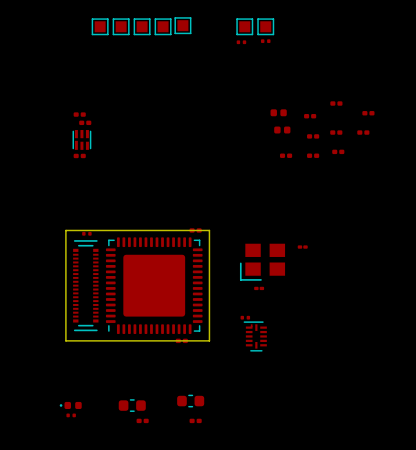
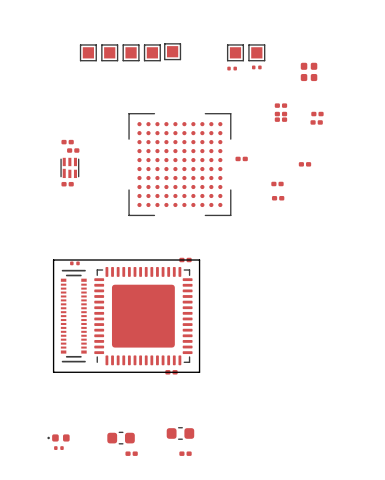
part: none -> (309, 66)
part: none -> (309, 77)
part: none -> (280, 105)
part: none -> (280, 114)
part: none -> (317, 114)
part: none -> (280, 119)
part: none -> (316, 122)
part: (336, 103) -> none
part: (278, 112) -> none
part: (368, 113) -> none
part: (310, 116) -> none
part: (282, 130) -> none
part: none -> (241, 158)
part: (336, 132) -> none
part: (363, 132) -> none
part: none -> (179, 164)
part: (338, 151) -> none
part: (313, 155) -> none
part: none -> (278, 198)
part: (302, 247) -> none
part: (262, 262) -> none
part: (259, 288) -> none
part: (245, 317) -> none
part: (255, 336) -> none

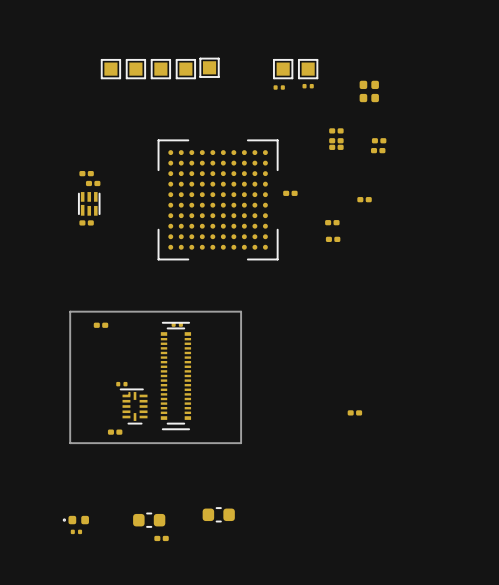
part: (185, 260) -> none
part footprint: [70, 261, 80, 266] -> [93, 322, 109, 328]
part footprint: [94, 267, 193, 366] -> [160, 321, 192, 431]
part: none -> (177, 324)
part: (73, 316) -> none
part: none -> (121, 384)
part: none -> (133, 406)
part: none -> (354, 412)
part: none -> (115, 432)
part: (171, 372) -> none
part: (185, 453) -> none

